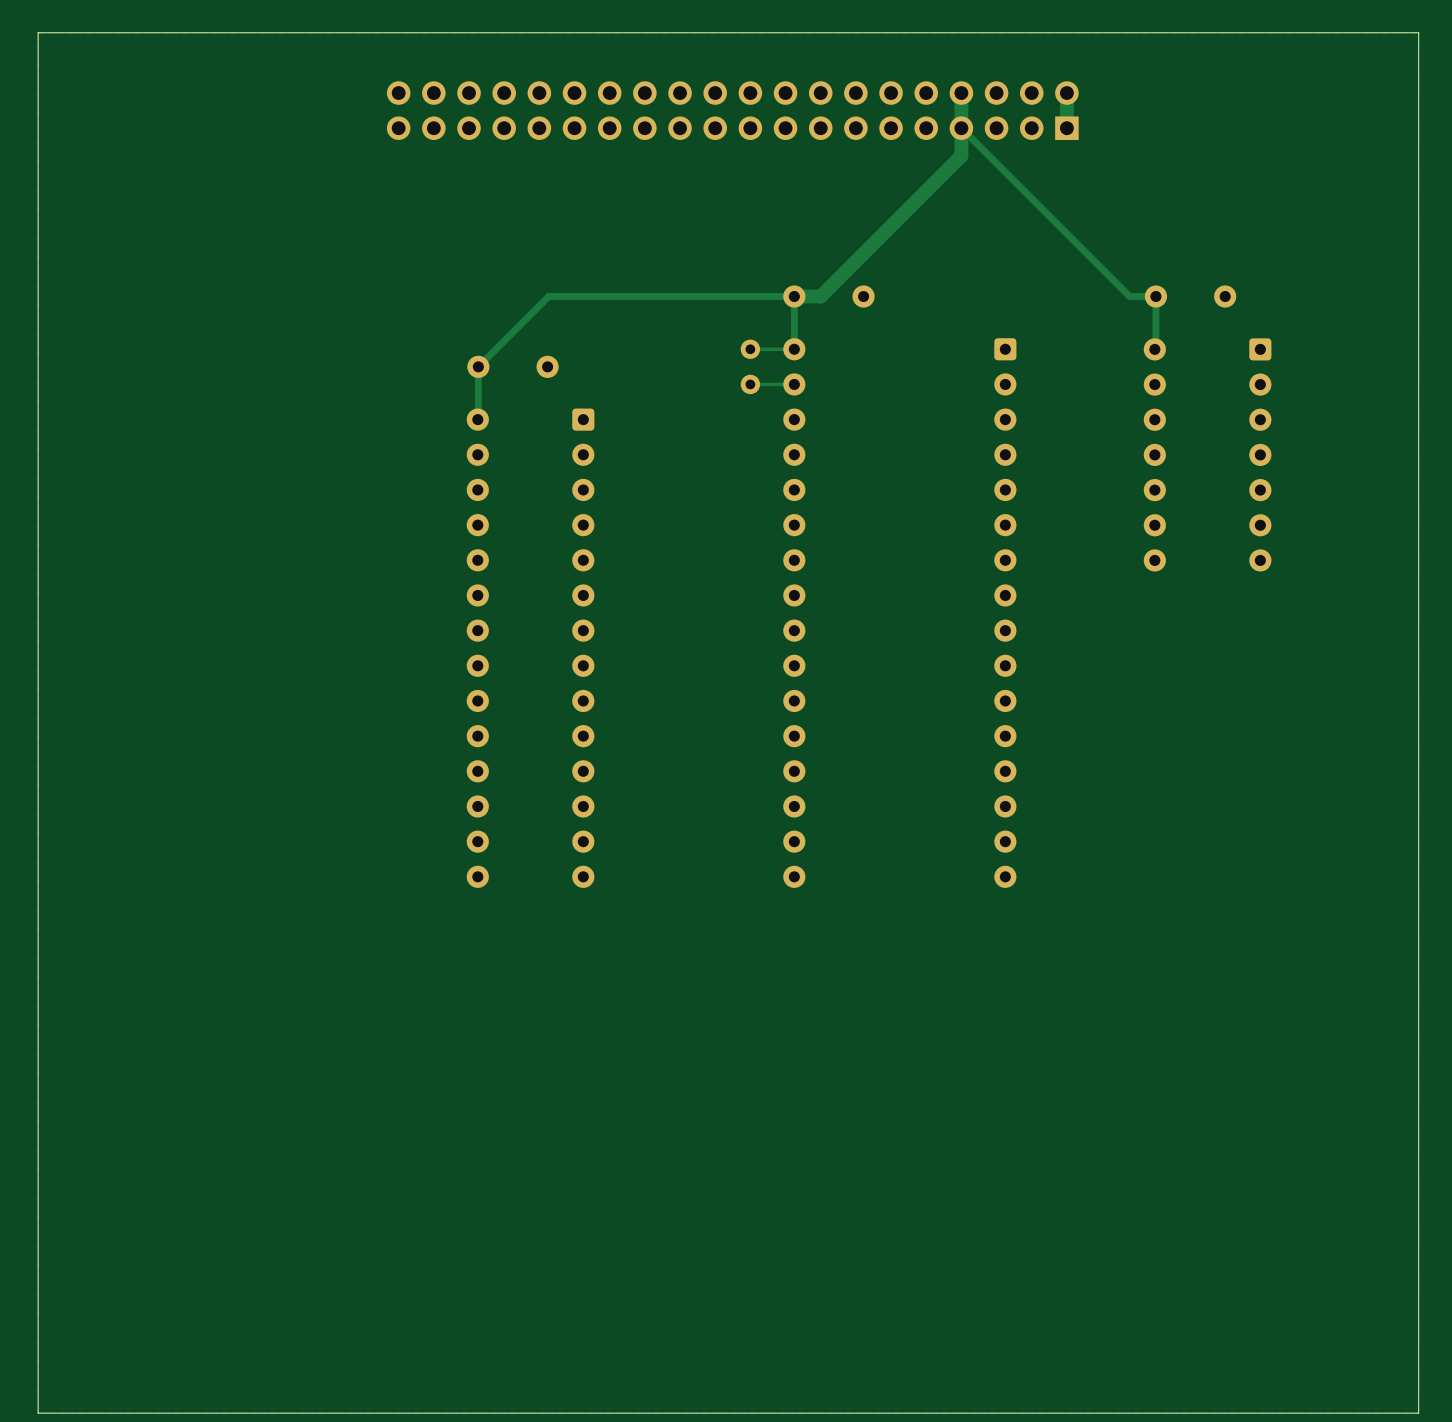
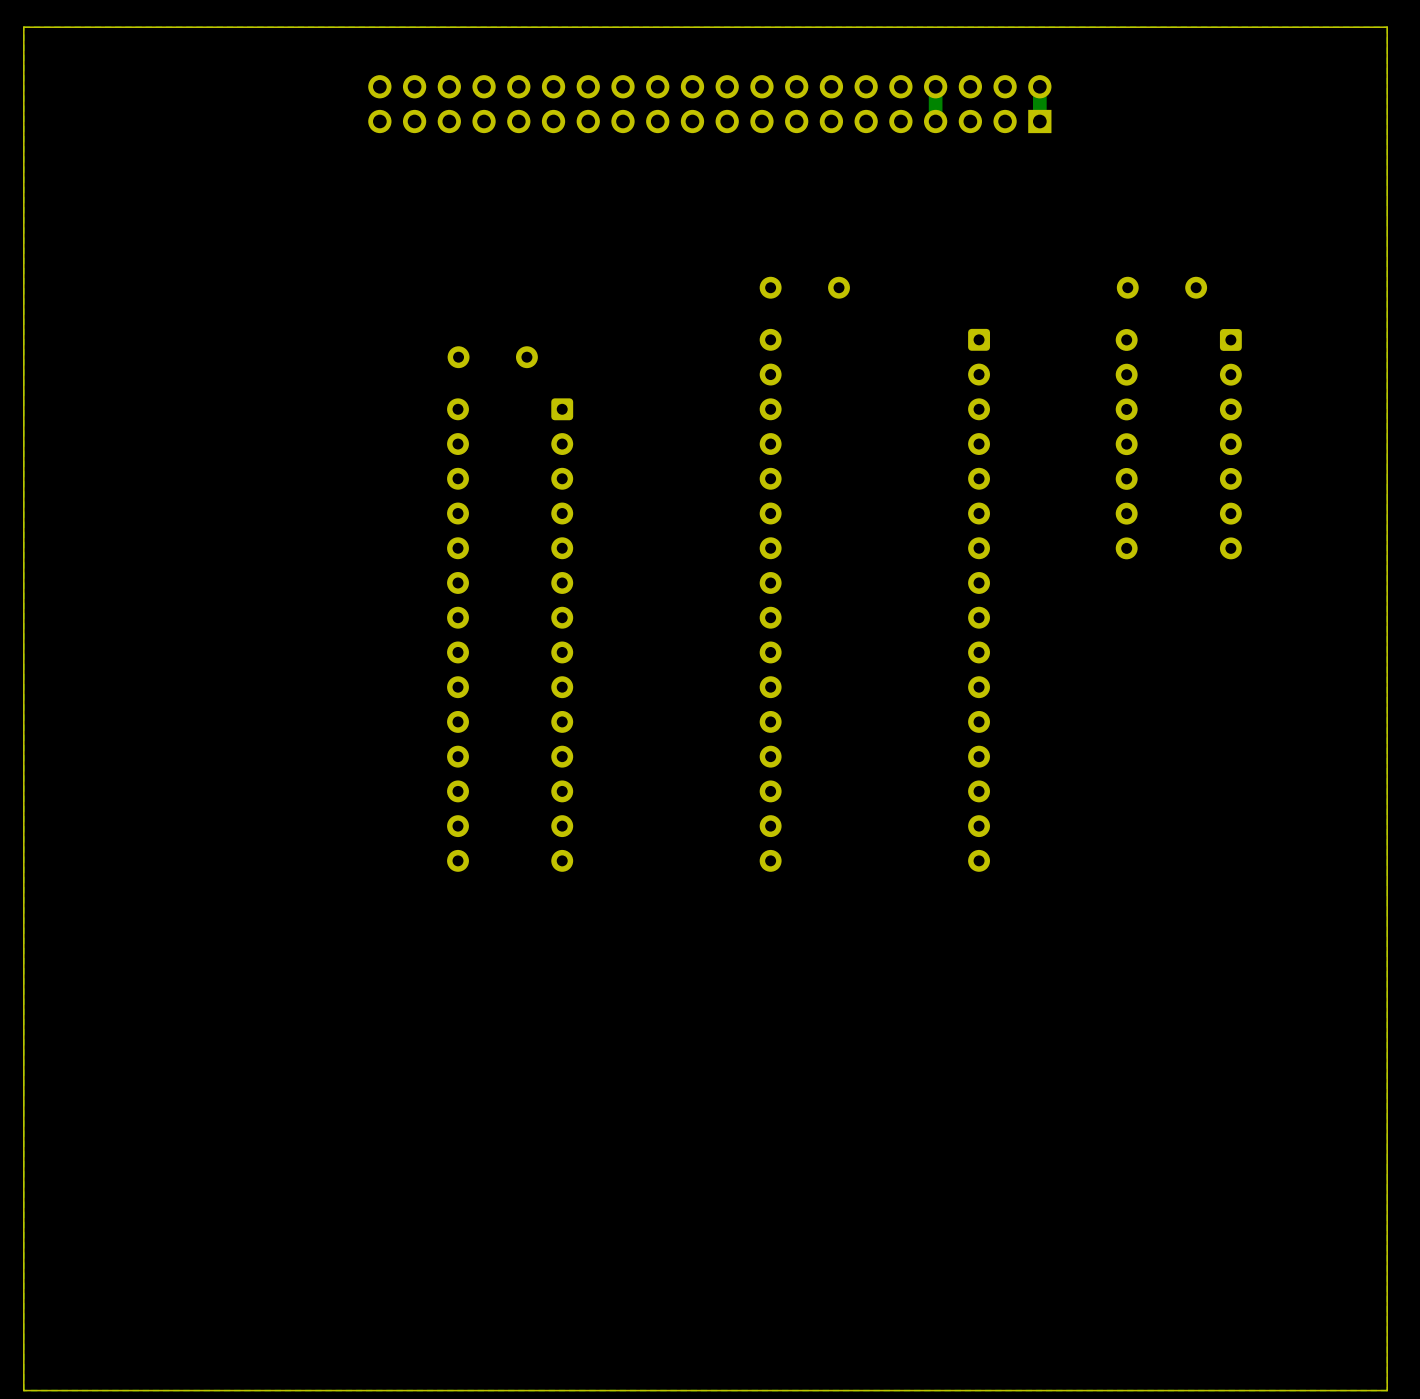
track: (793, 296) (548, 296) (478, 366) (478, 419) -> none
track: (1155, 348) (1155, 296) (1129, 296) (961, 128) (961, 155) (820, 296) (794, 296) (794, 349) (750, 349) -> none
part: (750, 366) -> none
track: (794, 384) (750, 384) -> none

